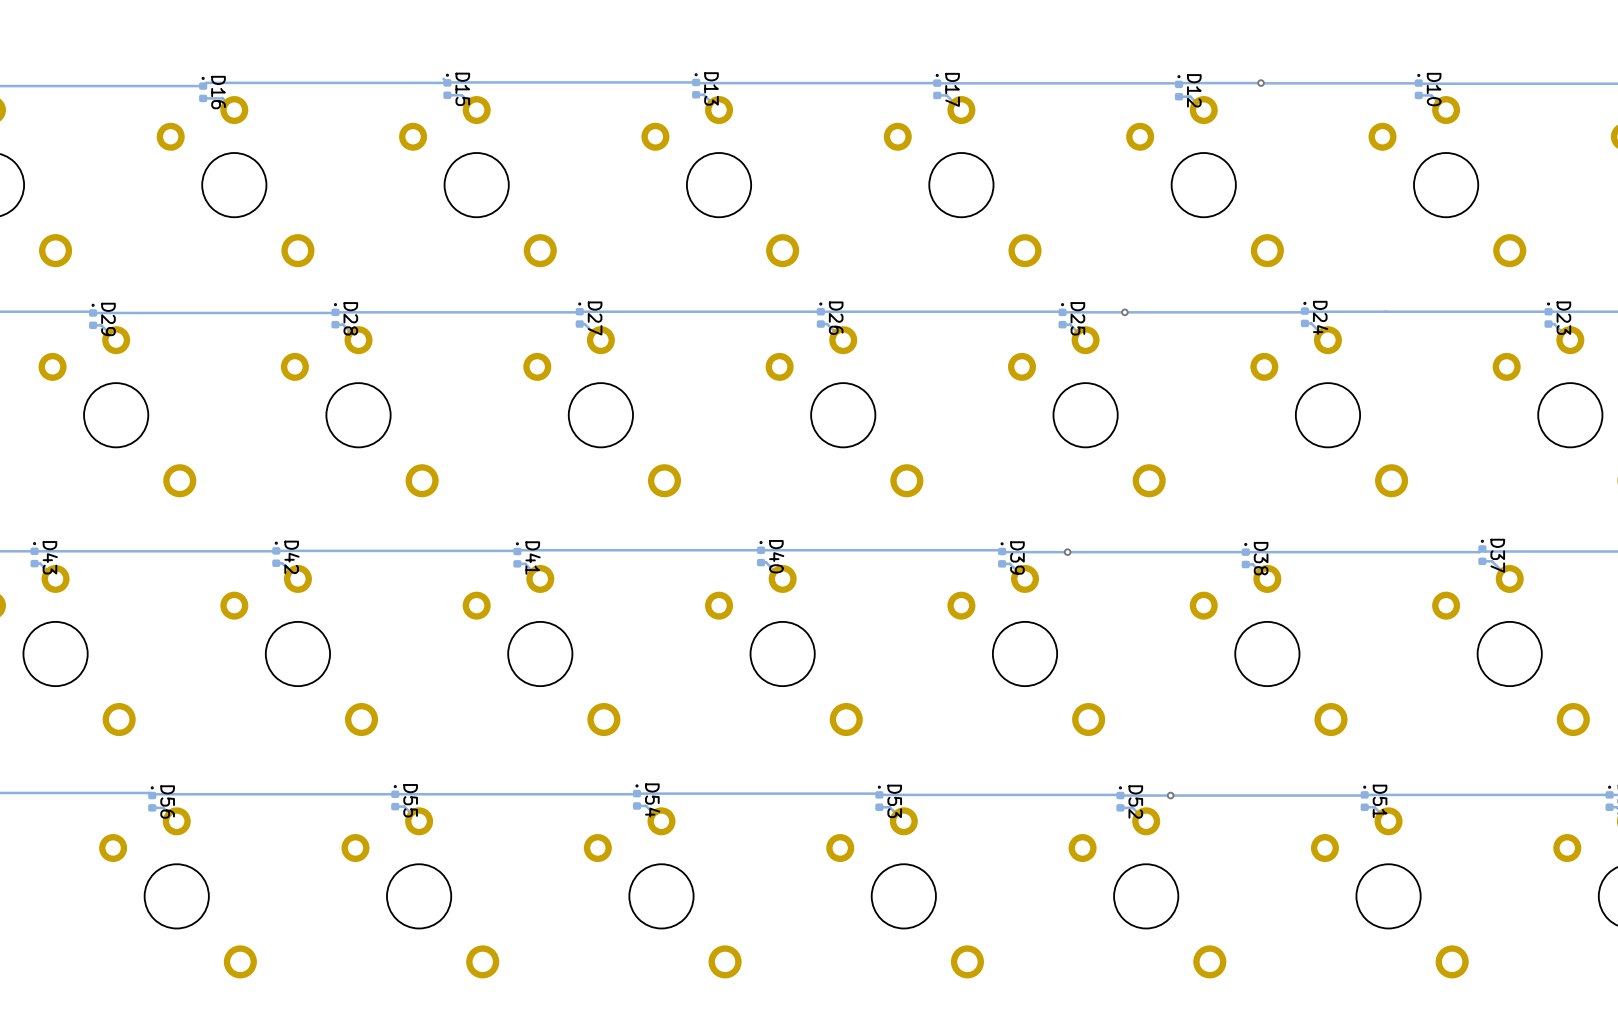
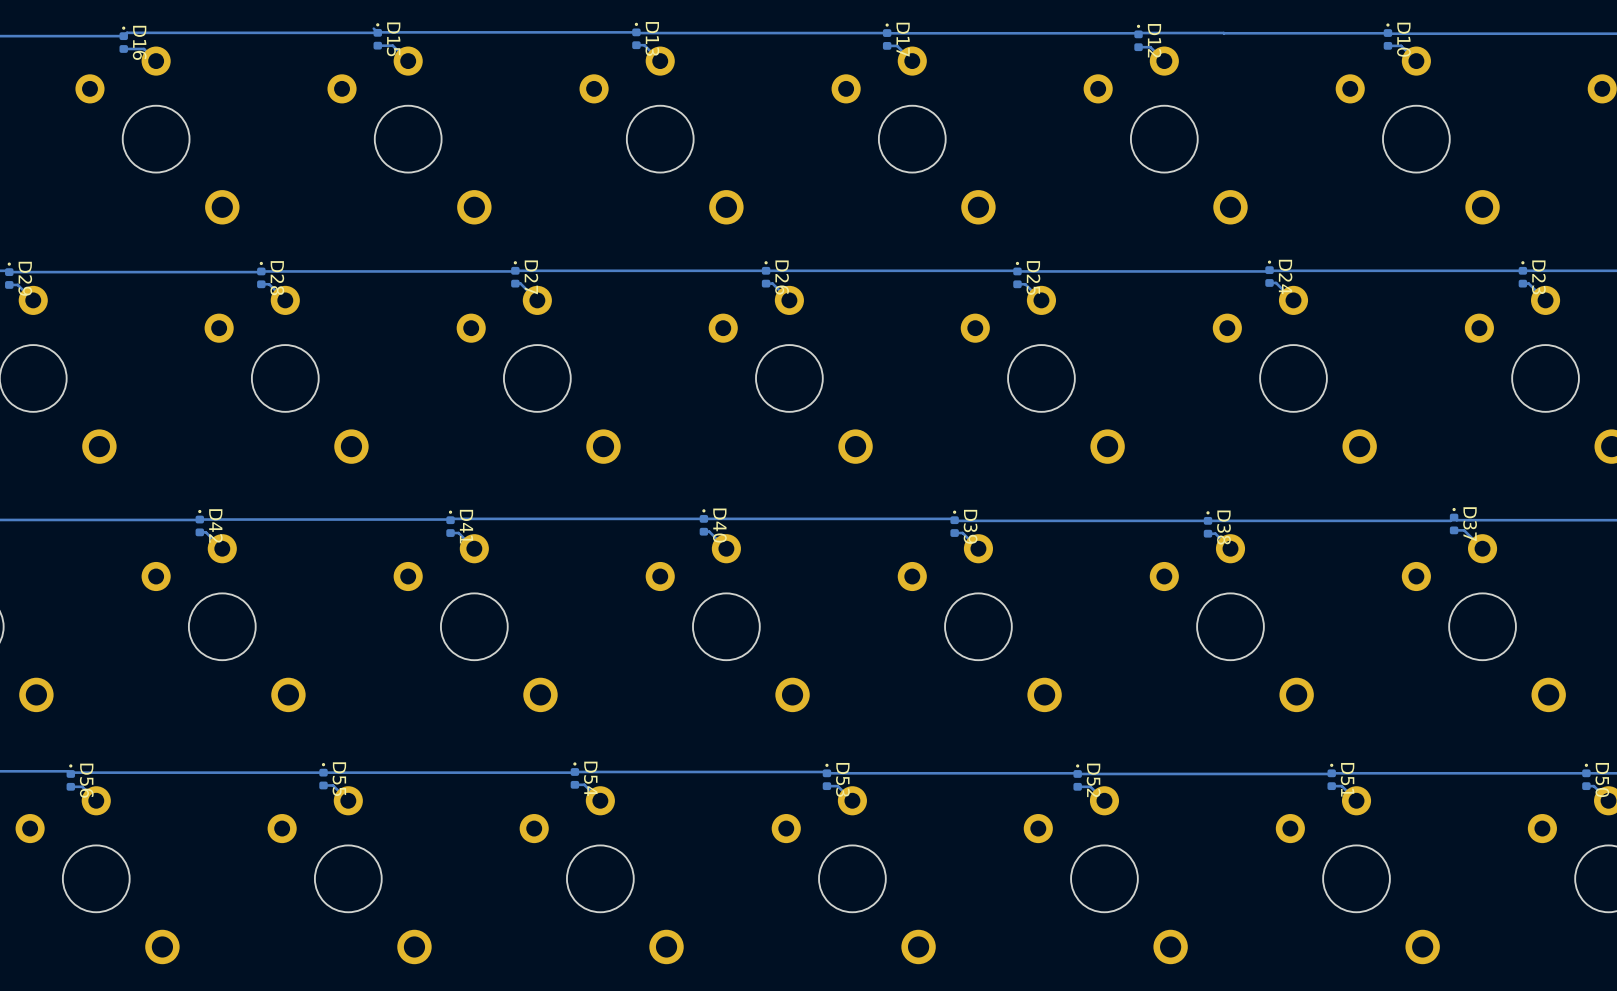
via: (1261, 83) -> none
via: (1124, 312) -> none
via: (1067, 552) -> none
via: (1170, 795) -> none

